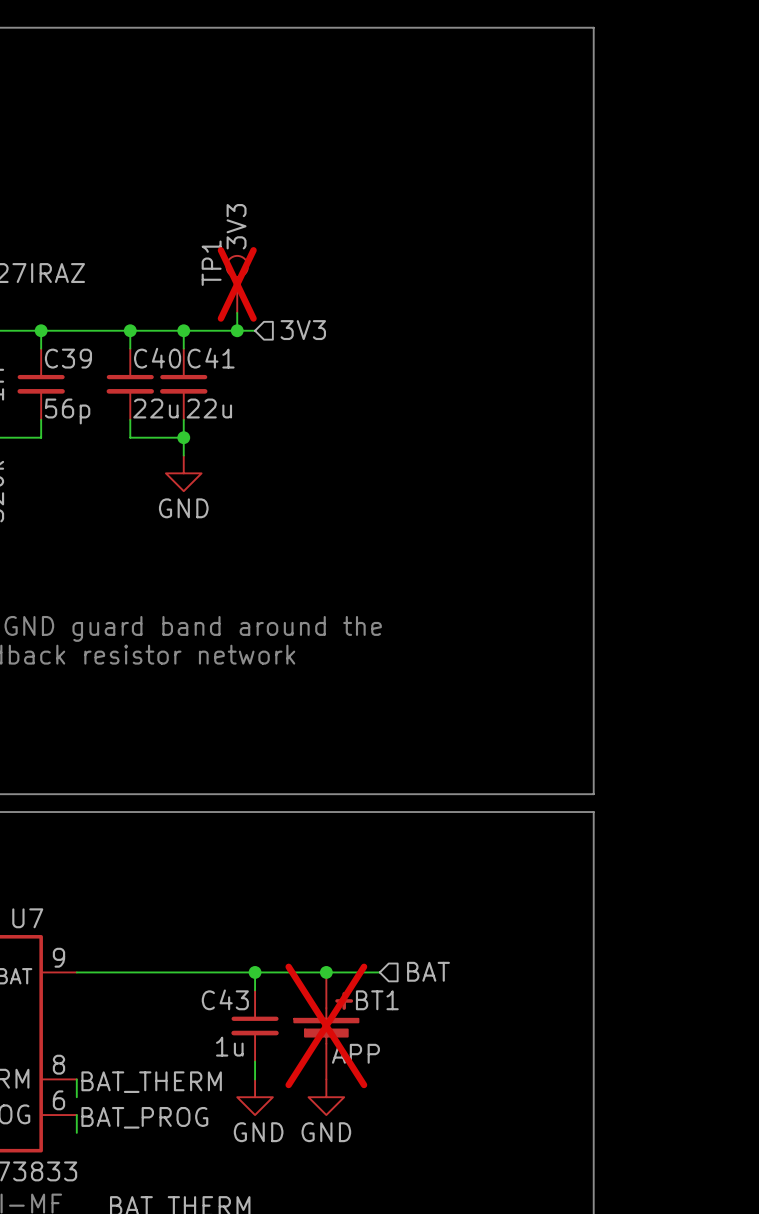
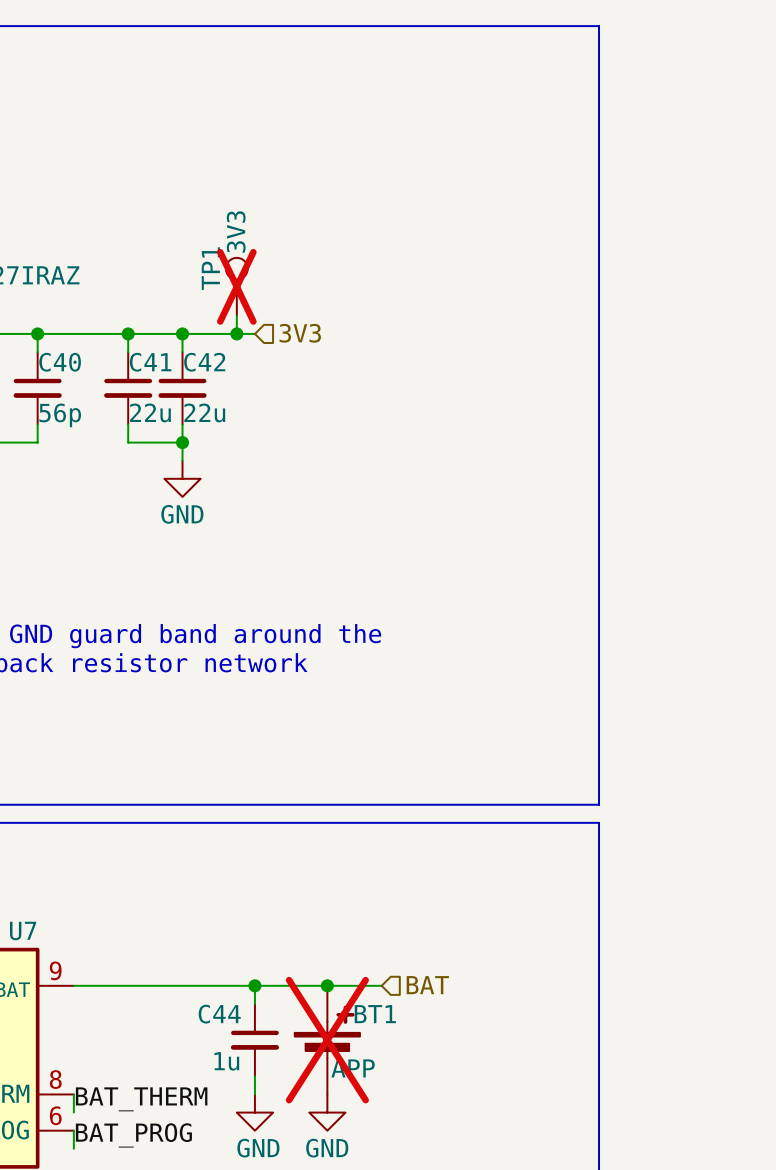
C39 name: C39 (68, 358) -> C40 (60, 362)
C40 name: C40 (157, 358) -> C41 (150, 362)
C41 name: C41 (211, 358) -> C42 (204, 362)
C43 name: C43 (225, 999) -> C44 (219, 1014)

